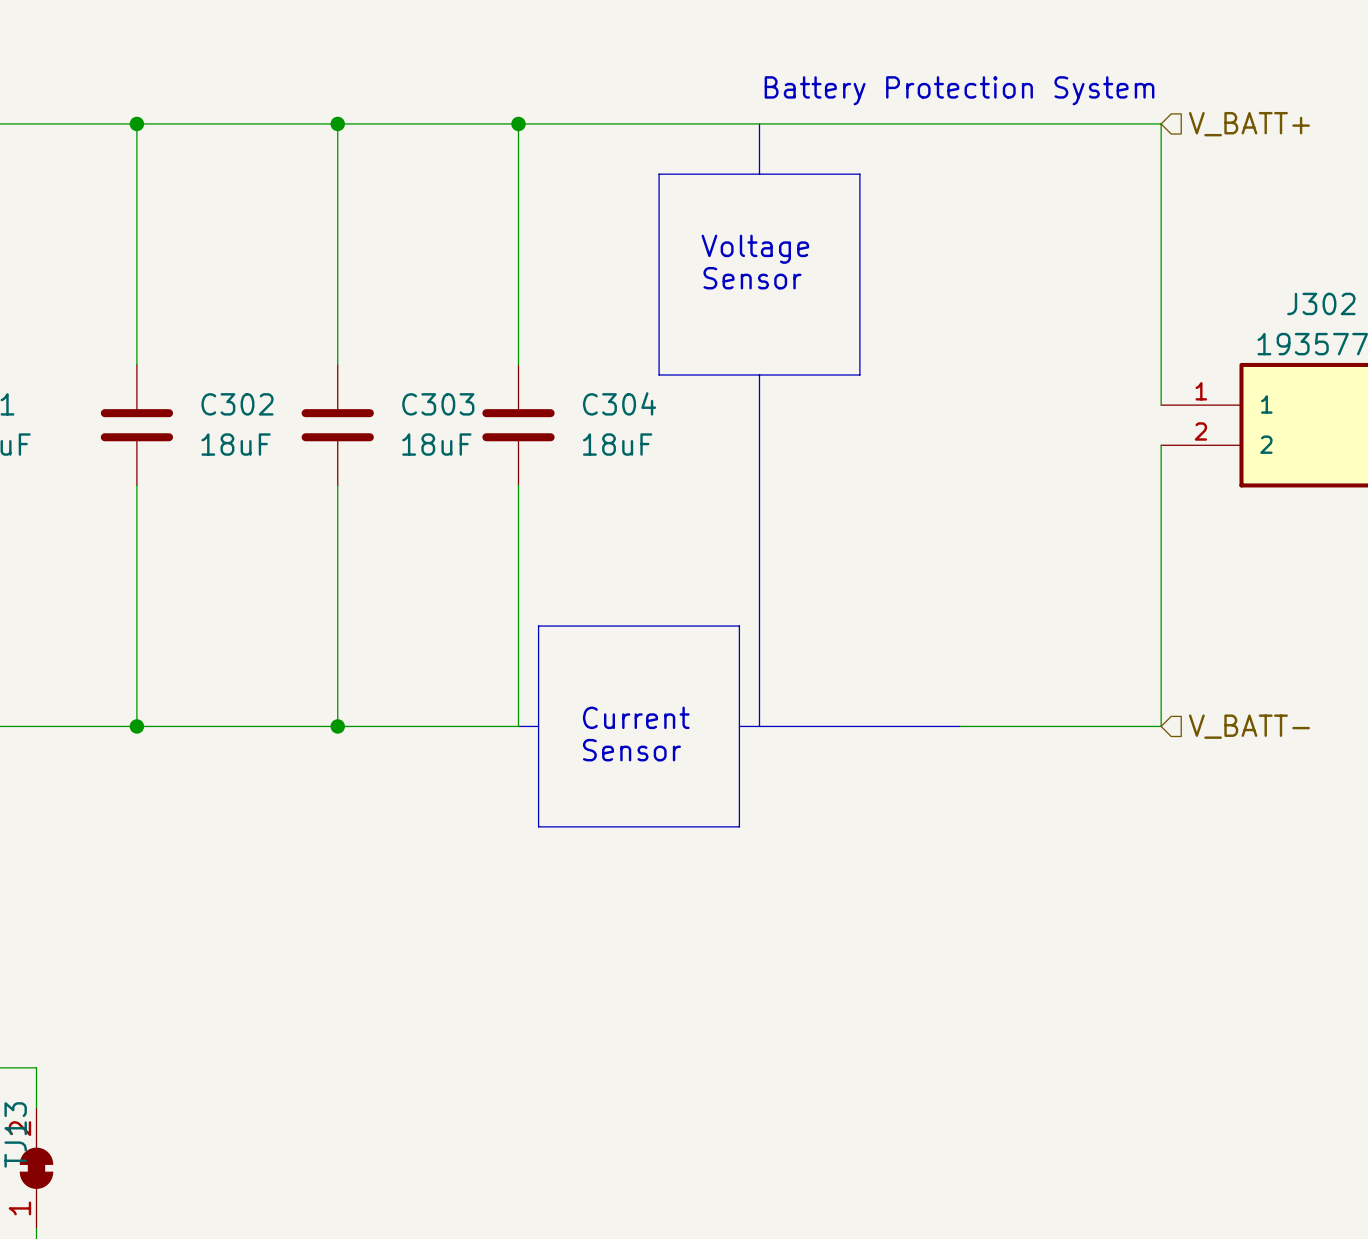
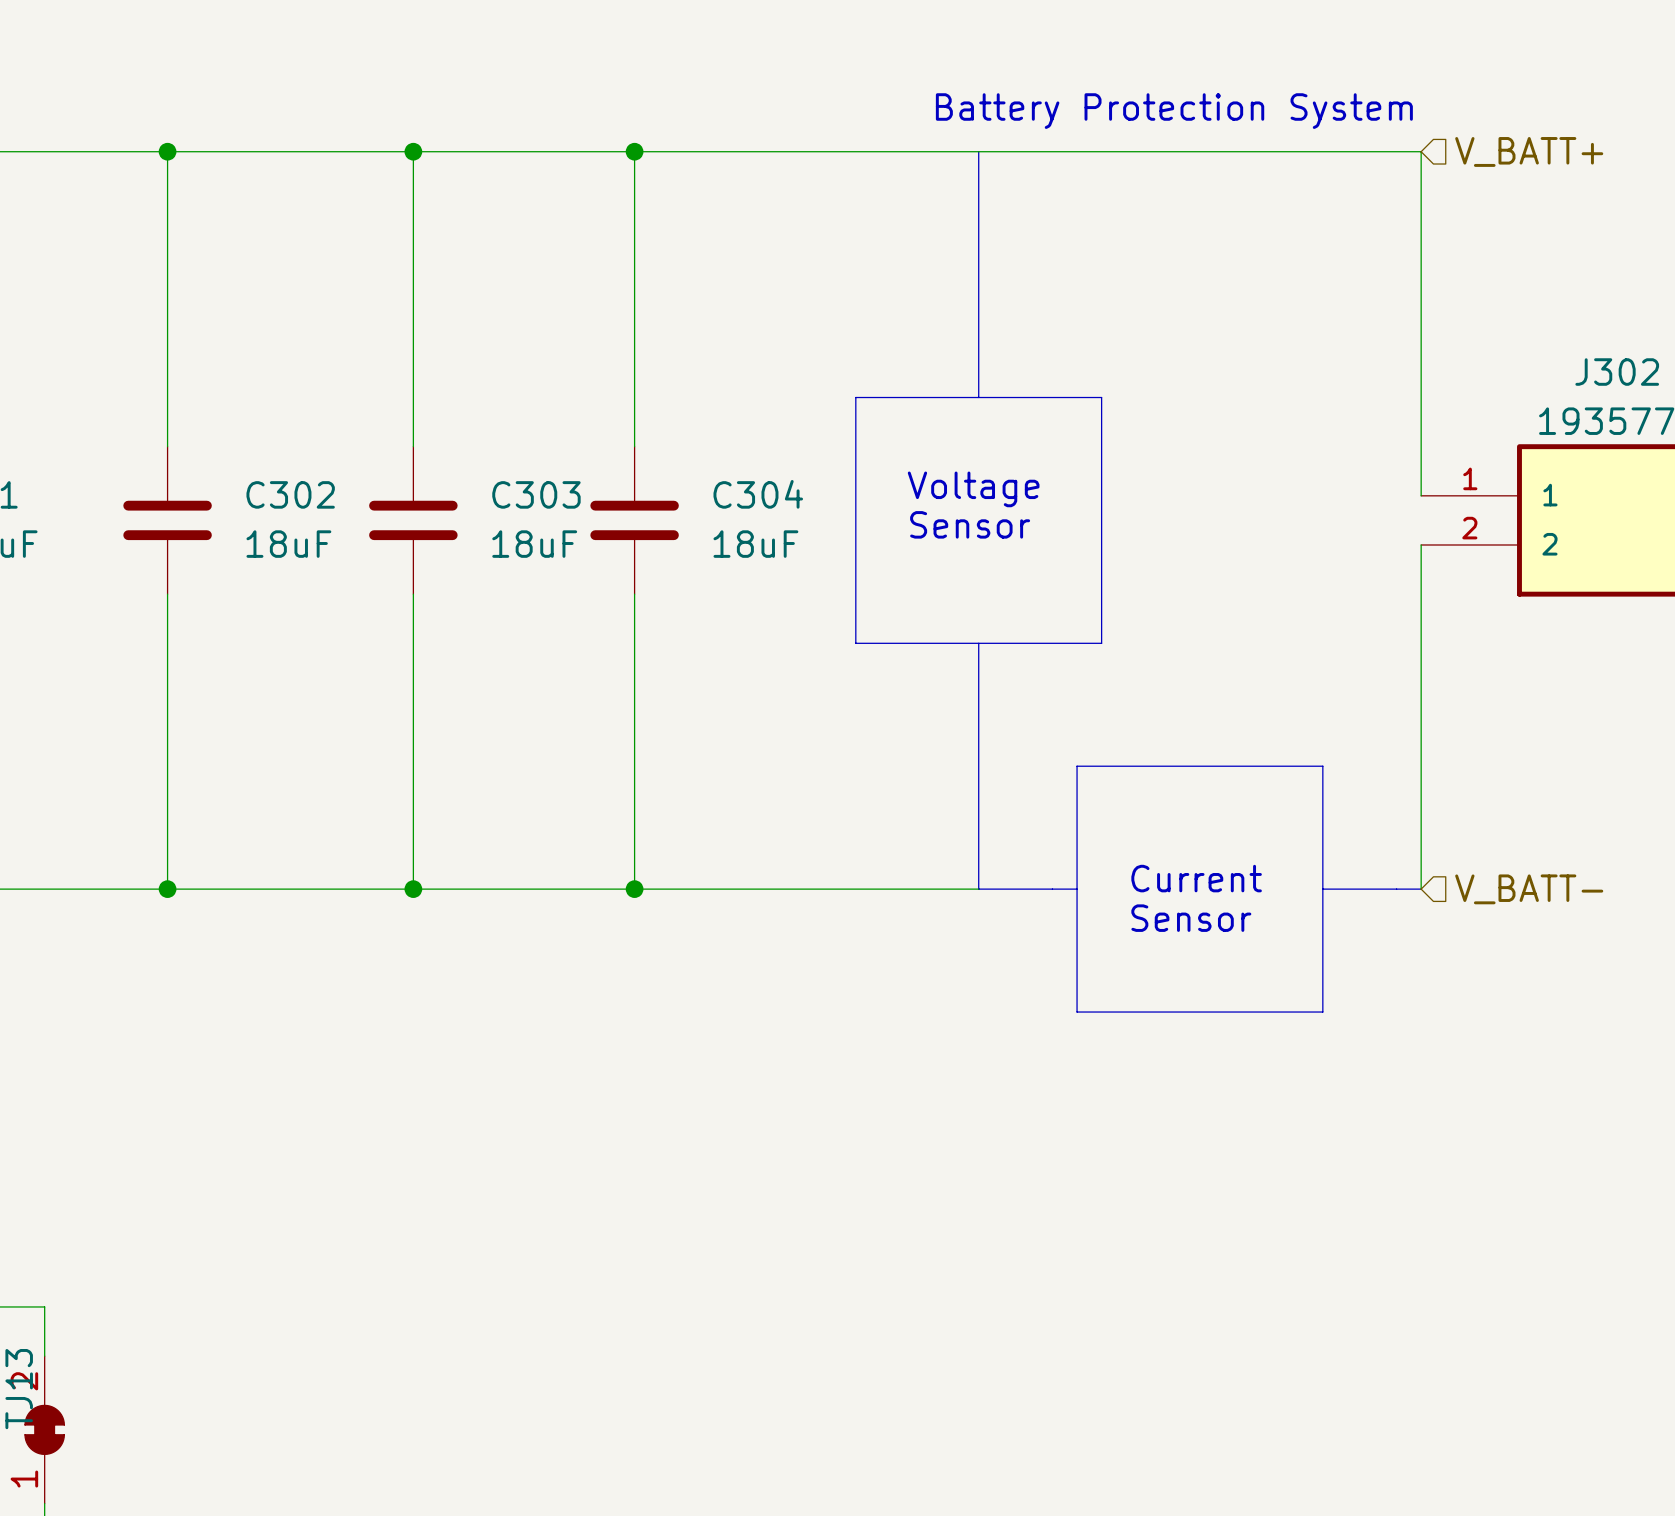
line: (759, 123) (759, 174) -> none
line: none -> (978, 151) (978, 397)
line: (659, 174) (659, 374) (859, 374) (859, 174) (659, 174) -> (855, 397) (855, 643) (1101, 643) (1101, 397) (855, 397)
text position: Voltage (755, 249) -> Voltage (973, 489)
text position: Sensor (752, 278) -> Sensor (970, 524)
line: (759, 374) (759, 726) -> none
line: (538, 626) (538, 826) (739, 826) (739, 626) (538, 626) -> (1077, 766) (1077, 1012) (1322, 1012) (1322, 766) (1077, 766)
text position: Current (636, 717) -> Current (1196, 878)
wire: none -> (634, 889) (978, 889)
line: (518, 726) (538, 726) -> none
junction: none -> (634, 889)
line: (739, 726) (799, 726) -> (978, 643) (978, 889)
line: (879, 726) (960, 726) -> (1322, 889) (1421, 889)
wire: (960, 726) (1161, 726) -> none
text: Sensor (631, 750) -> none
text: none -> Sensor (1191, 918)

